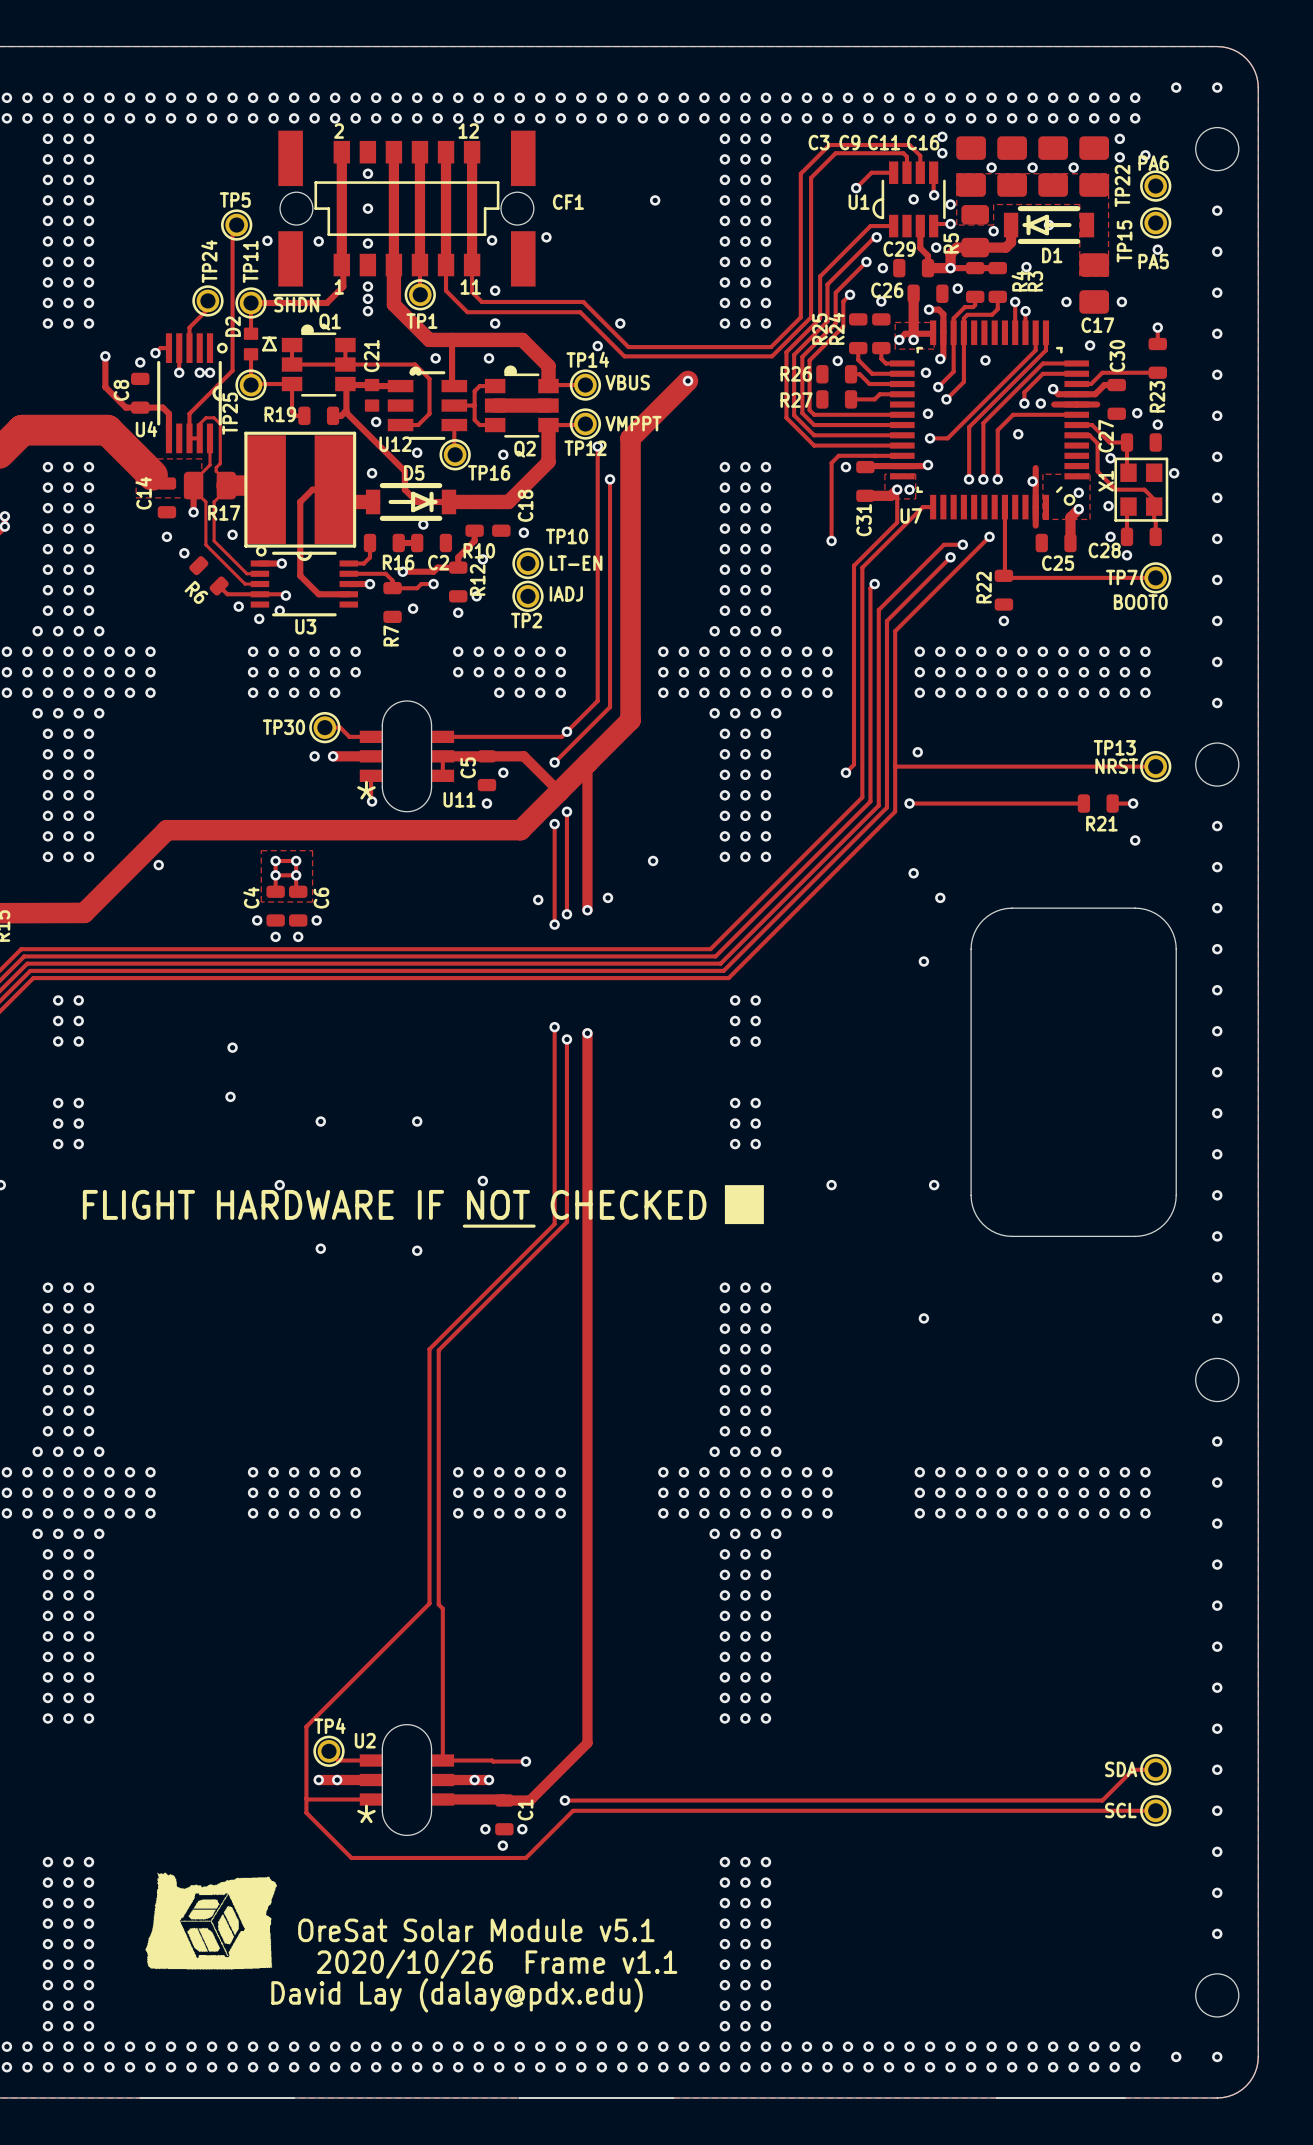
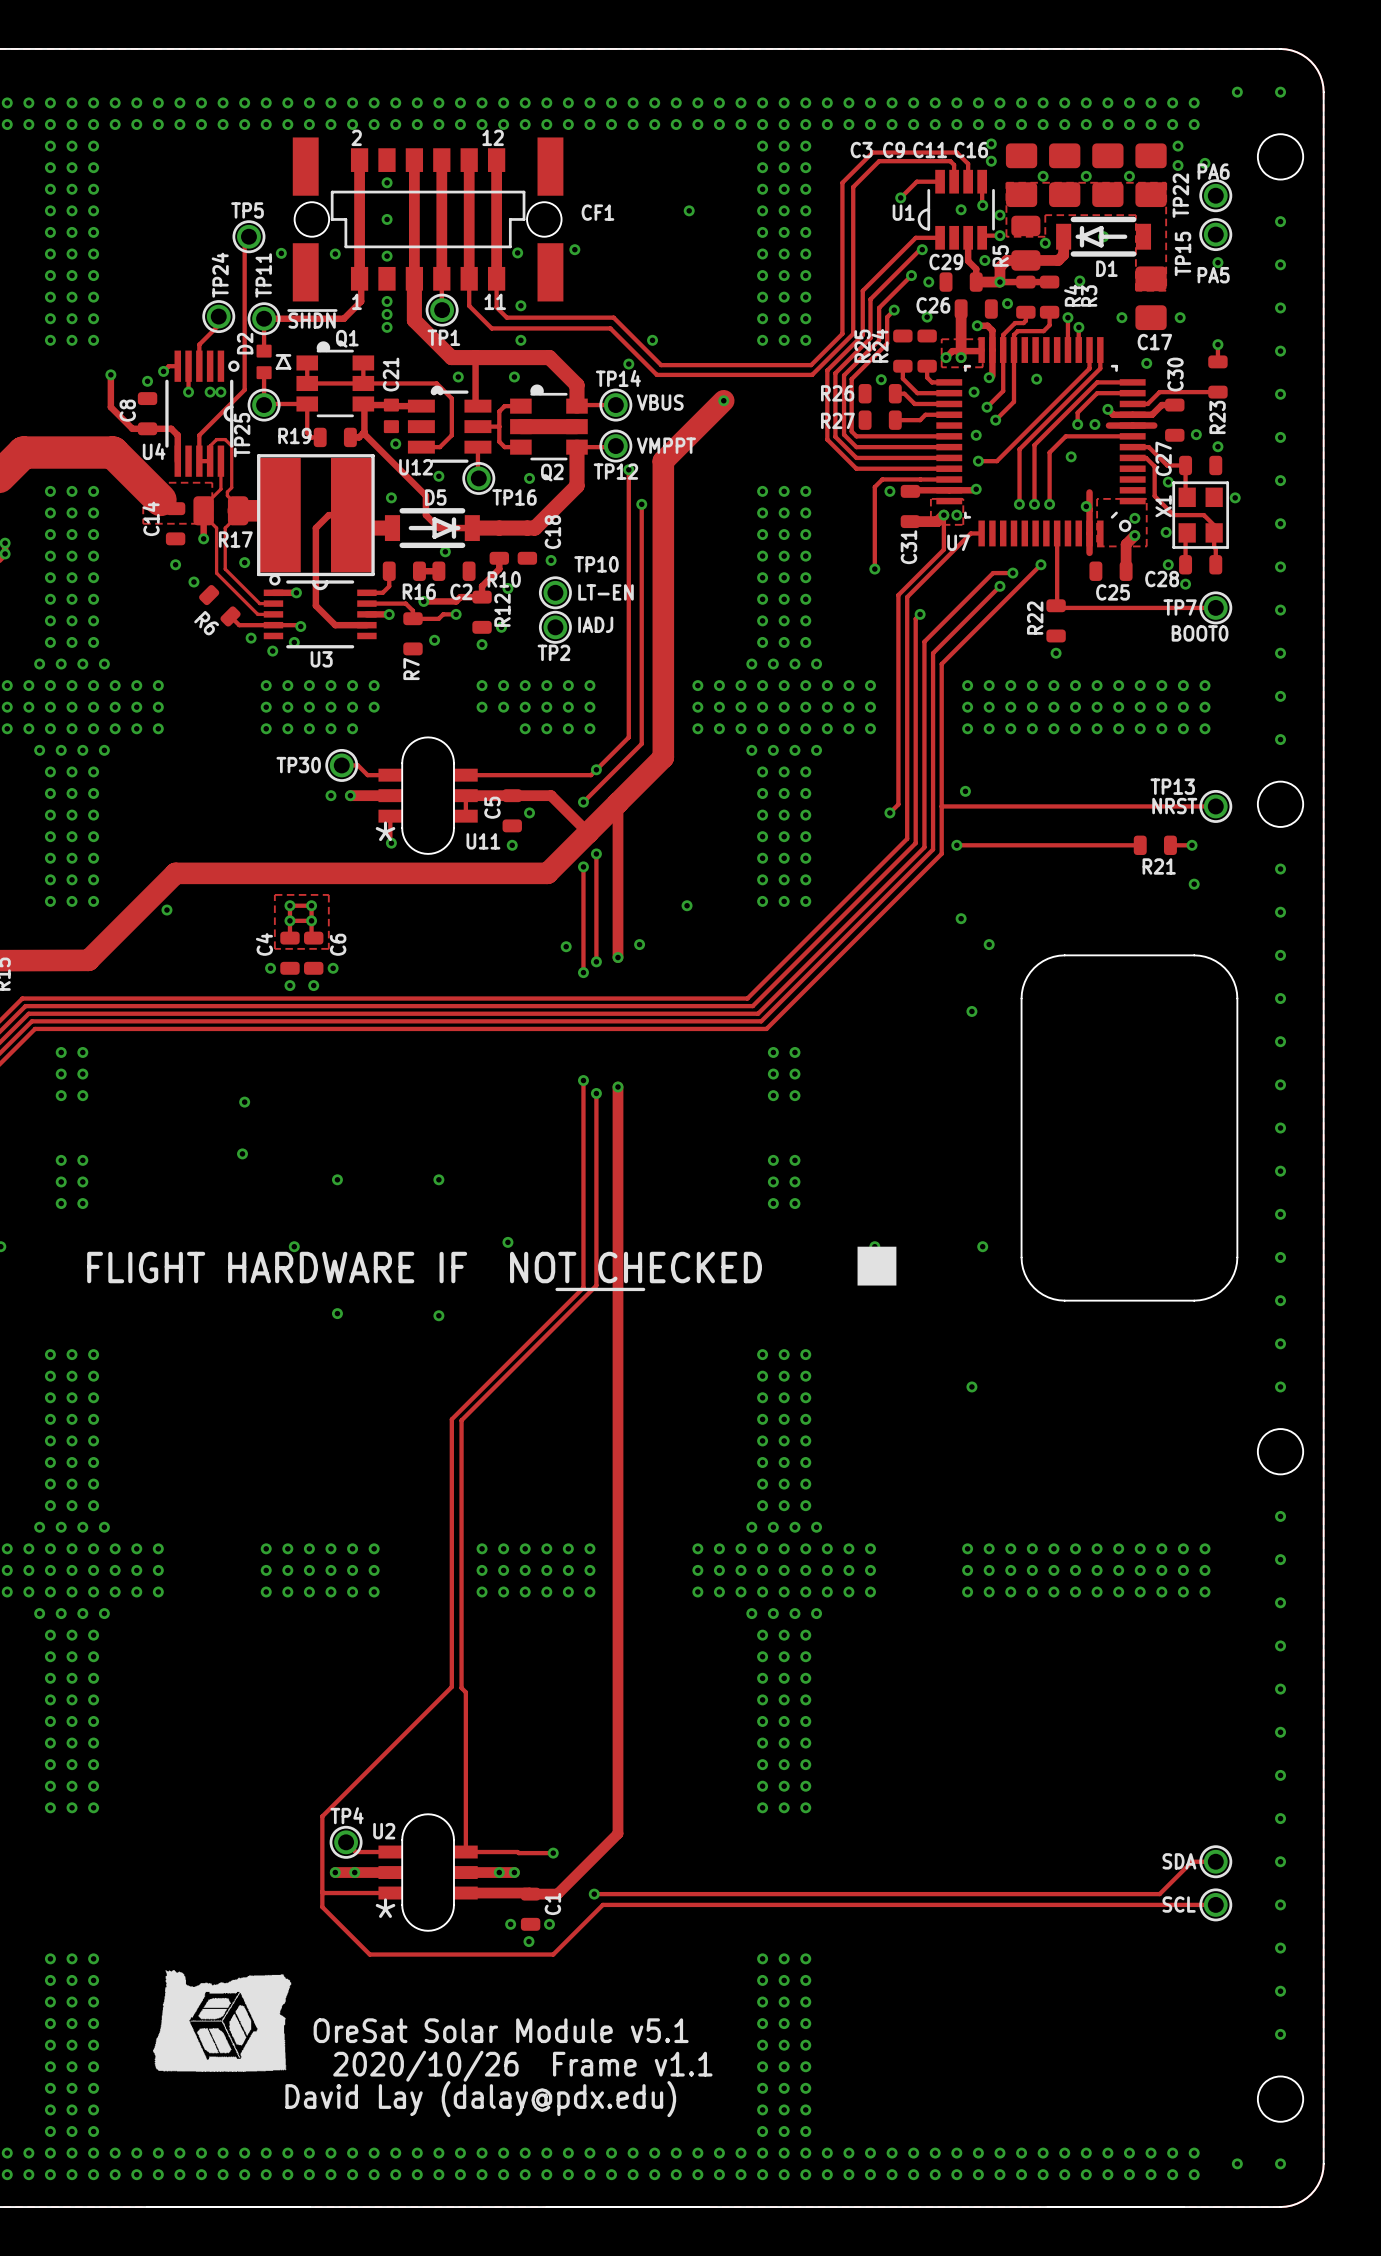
drawing: [462, 1185, 764, 1228] -> none
drawing: none -> [555, 1246, 897, 1292]

